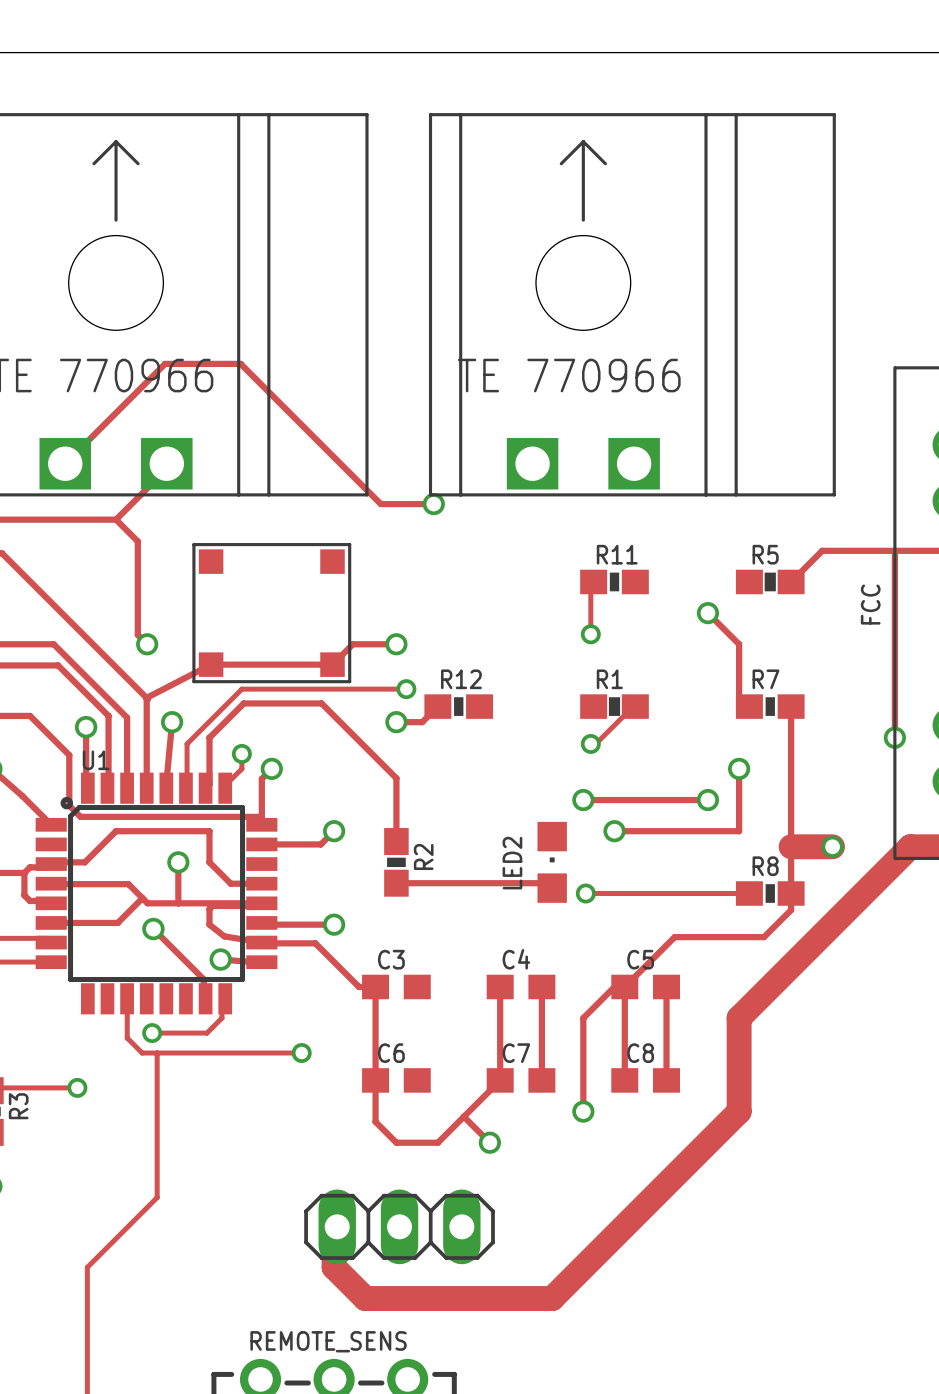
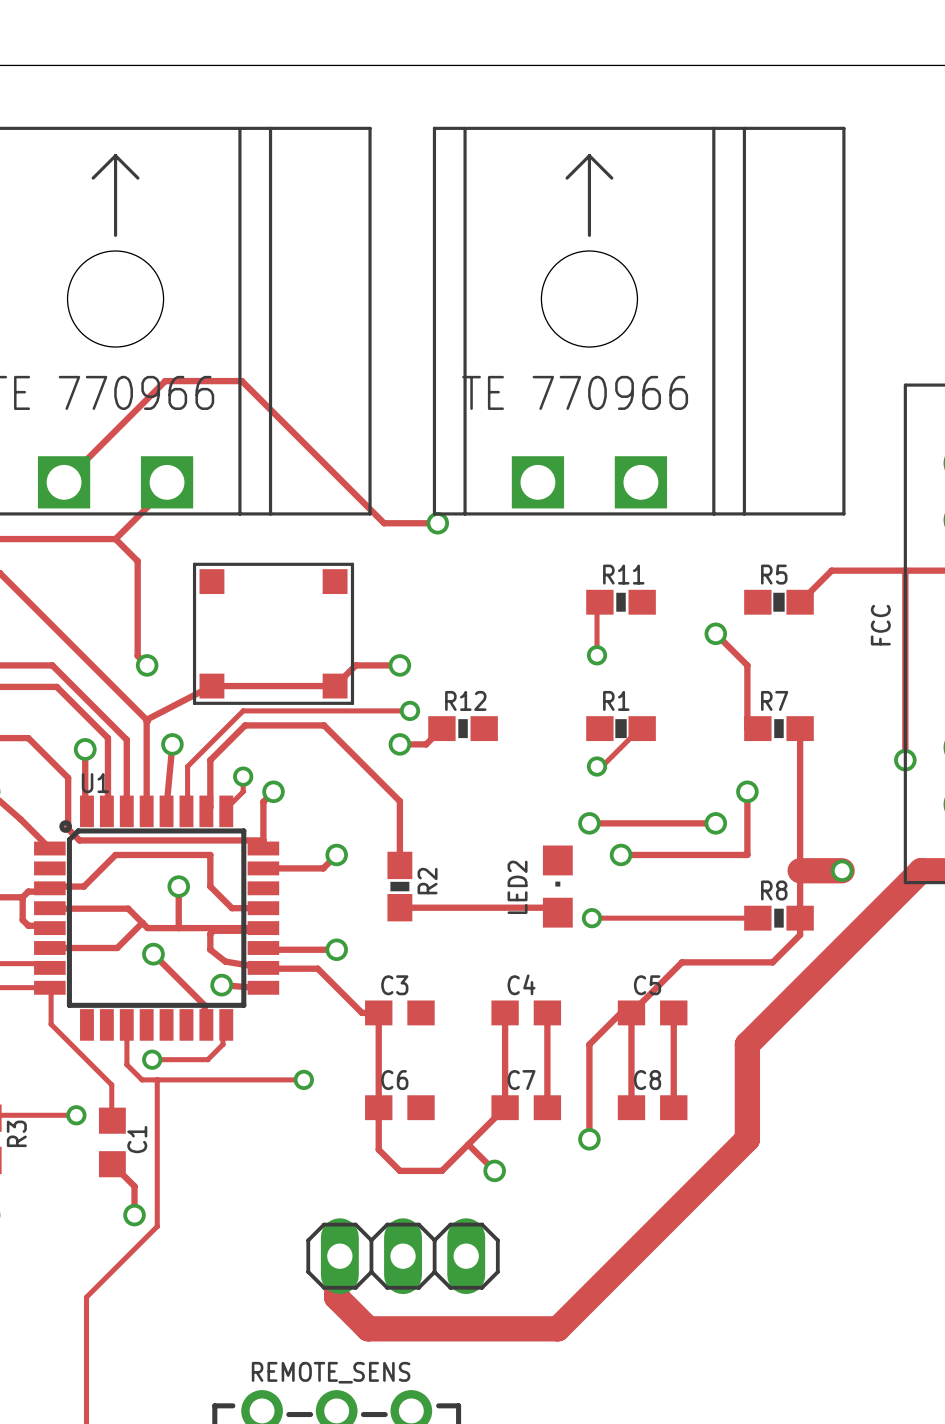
track: none -> (49, 987) (51, 1024) (111, 1084) (112, 1120)
C1: none -> (112, 1142)
track: none -> (112, 1164) (134, 1186) (134, 1215)
via: none -> (134, 1215)

